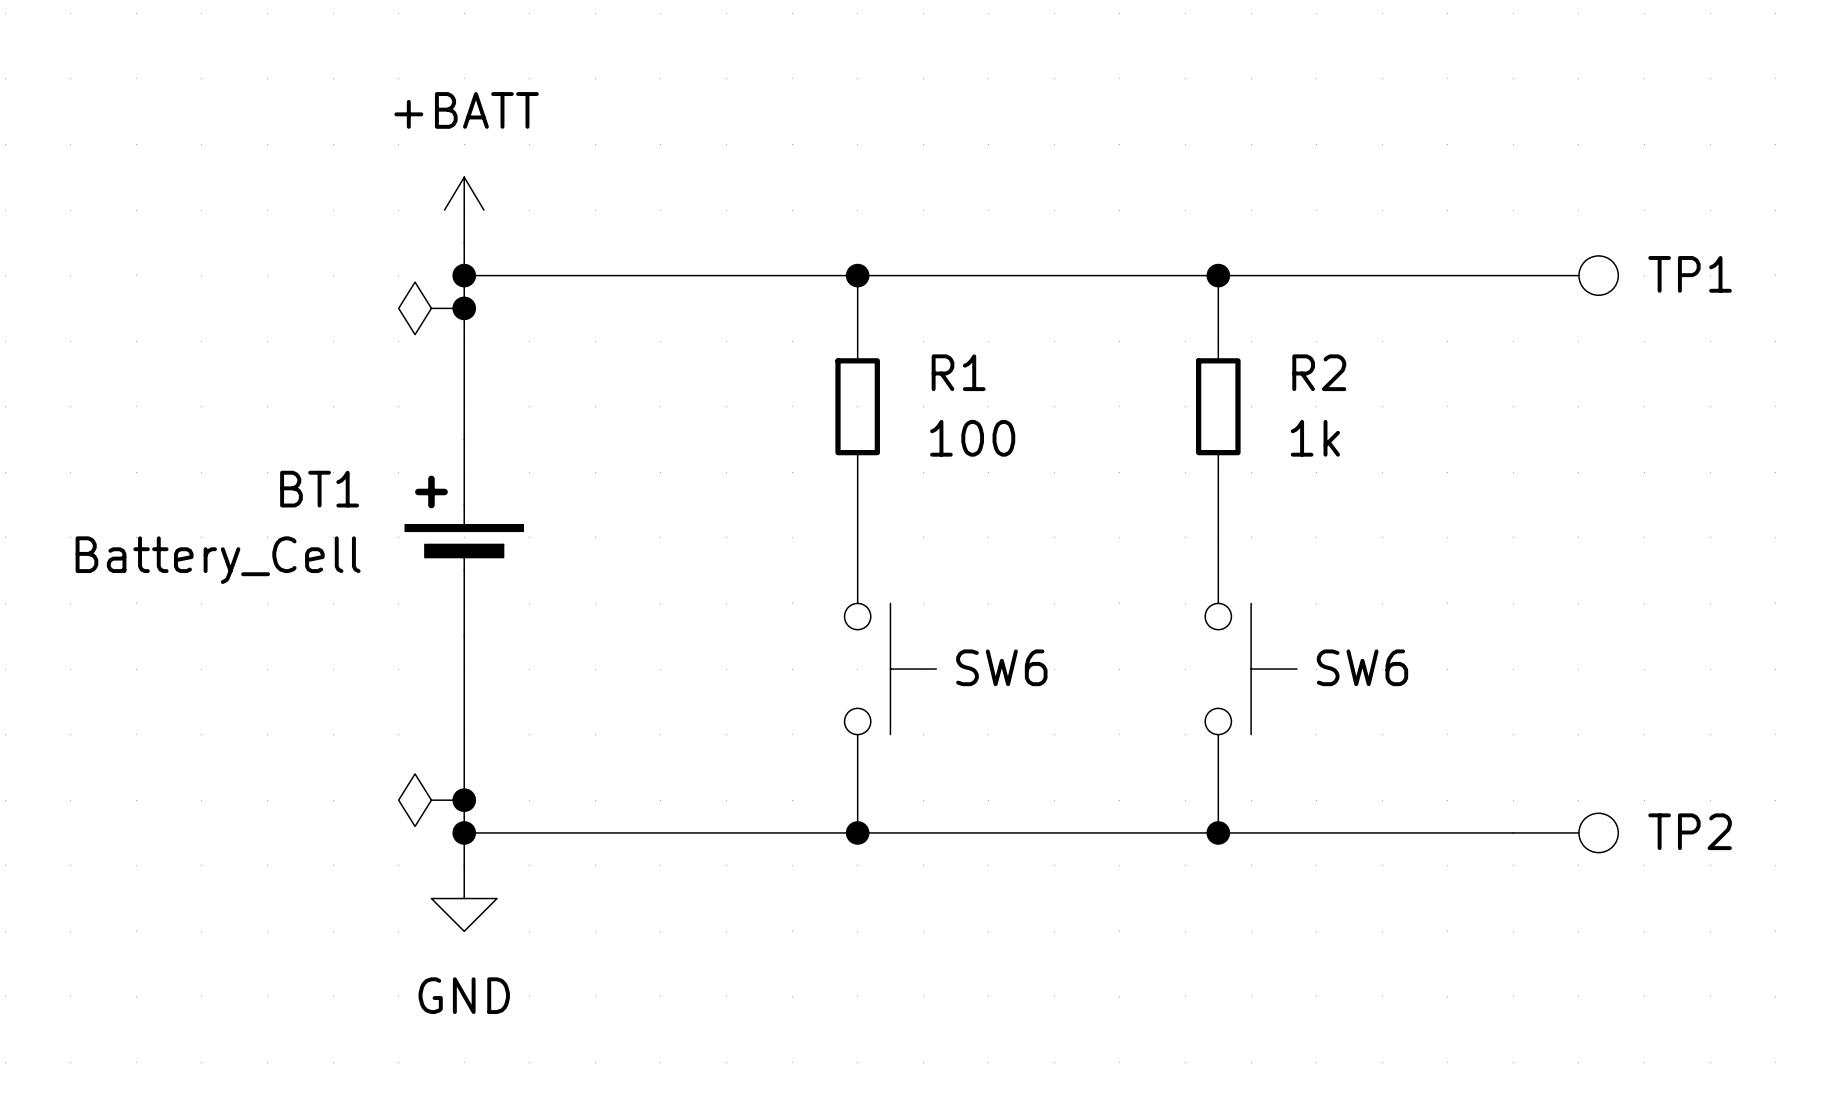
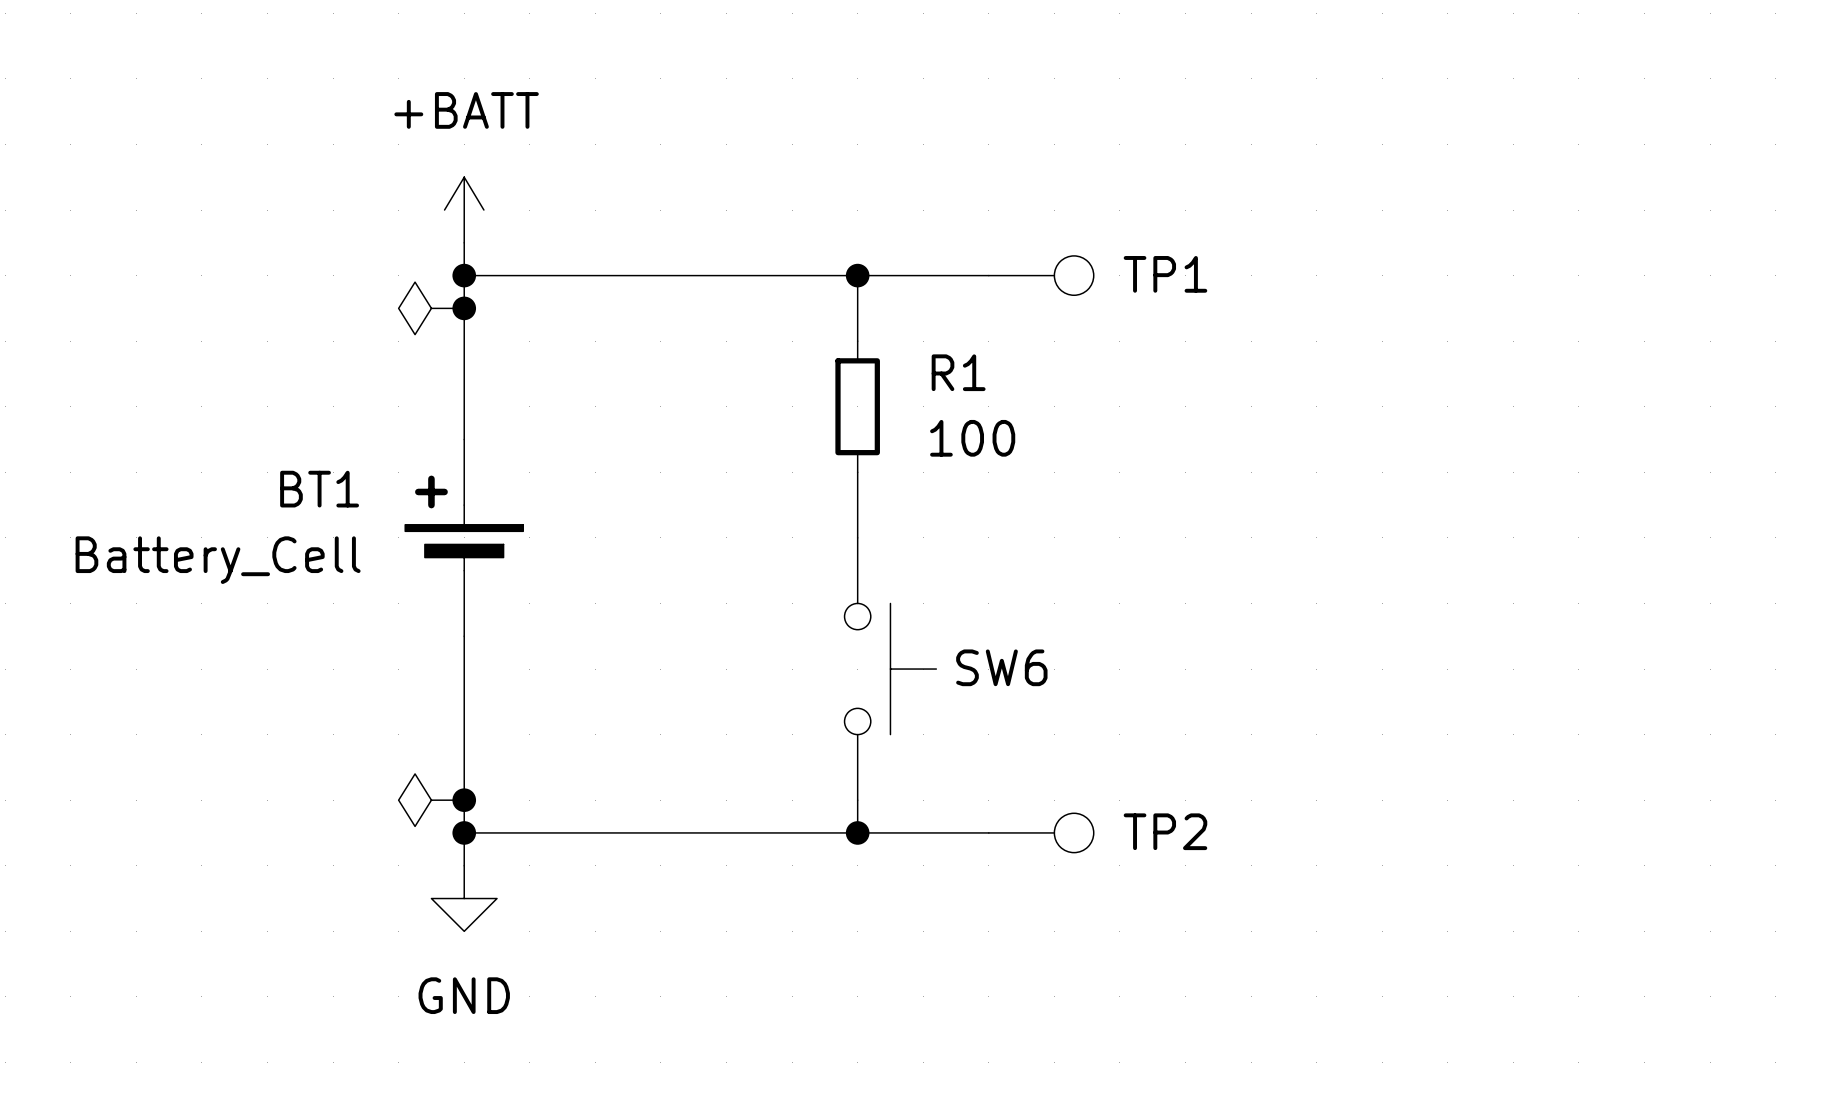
wire: (988, 275) (1513, 275) -> none
wire: (1218, 275) (1218, 341) -> none
junction: (1218, 275) -> none
TP1 position: (1565, 275) -> (1041, 275)
R2: 1k (1218, 406) -> none
wire: (1218, 472) (1218, 537) -> none
SW6: (1251, 669) -> none
wire: (1218, 800) (1218, 832) -> none
wire: (988, 832) (1513, 832) -> none
junction: (1218, 832) -> none
TP2 position: (1565, 832) -> (1041, 832)

